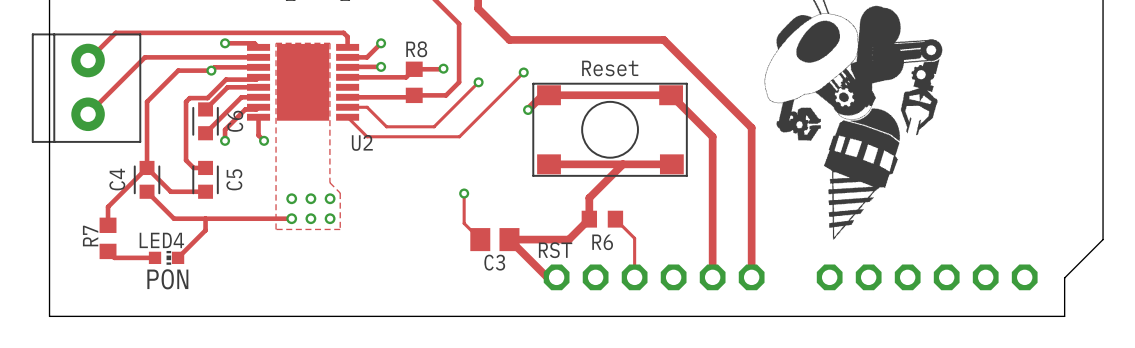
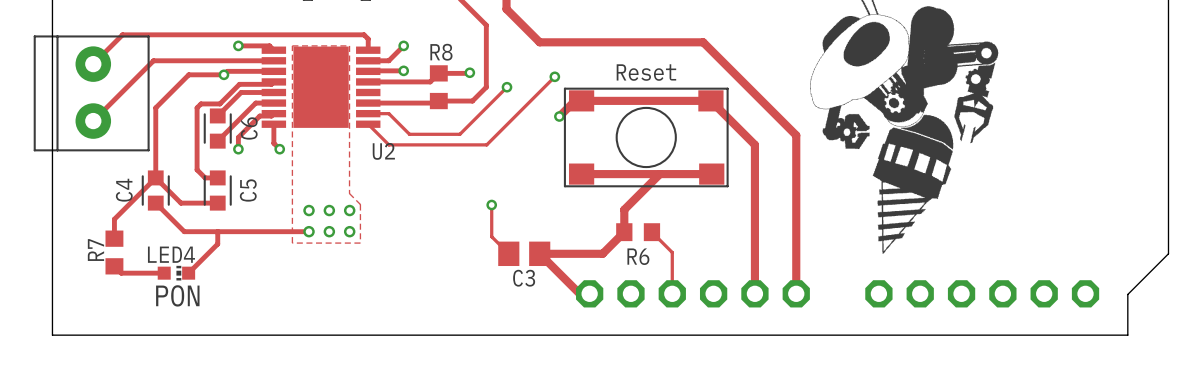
text: RST (555, 250) -> none

